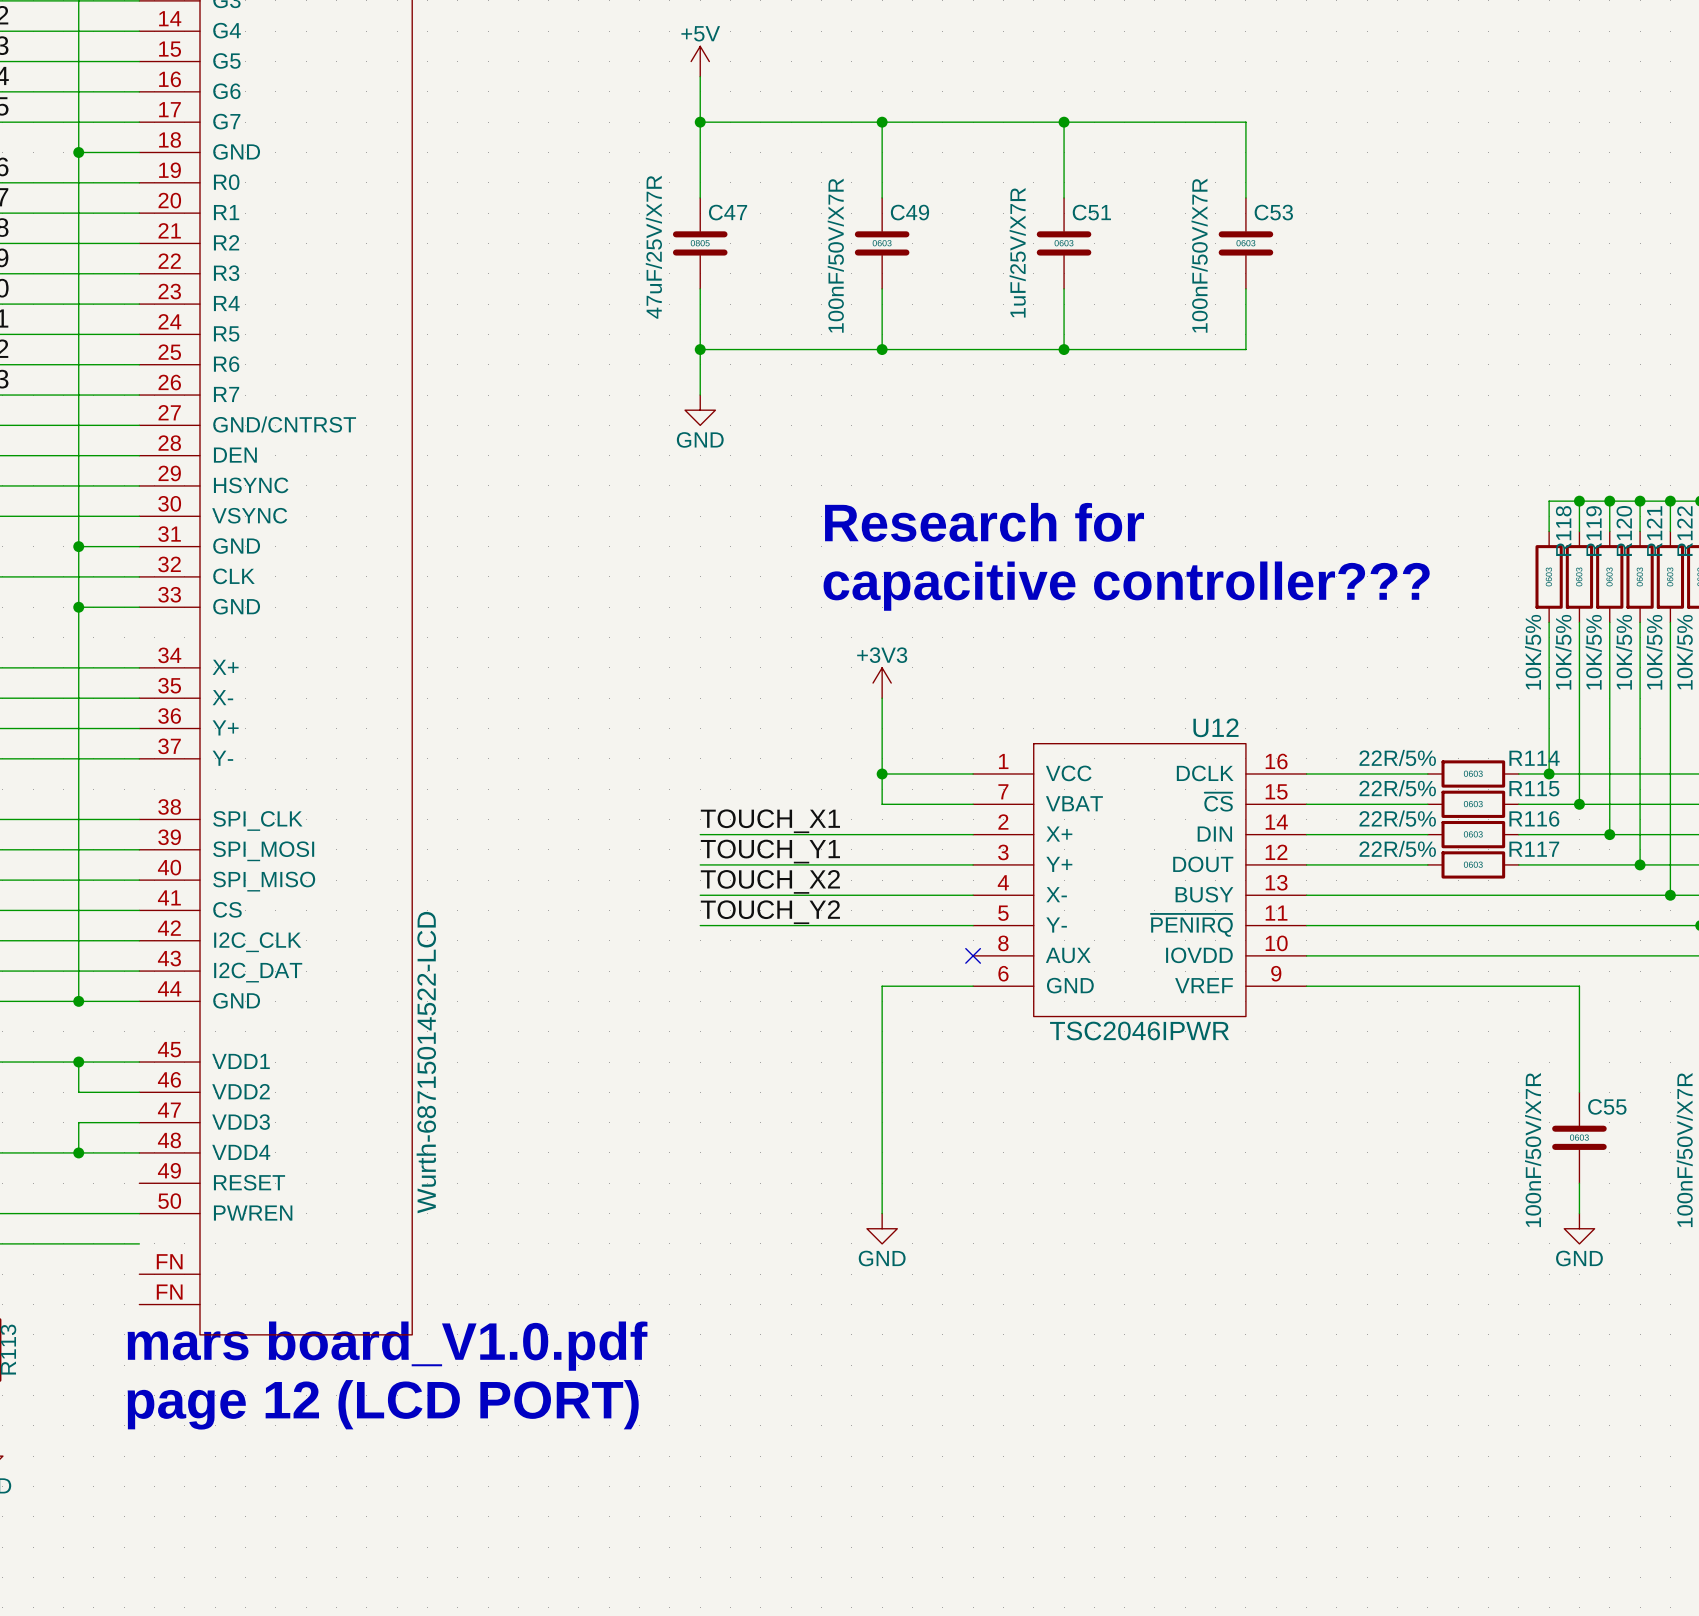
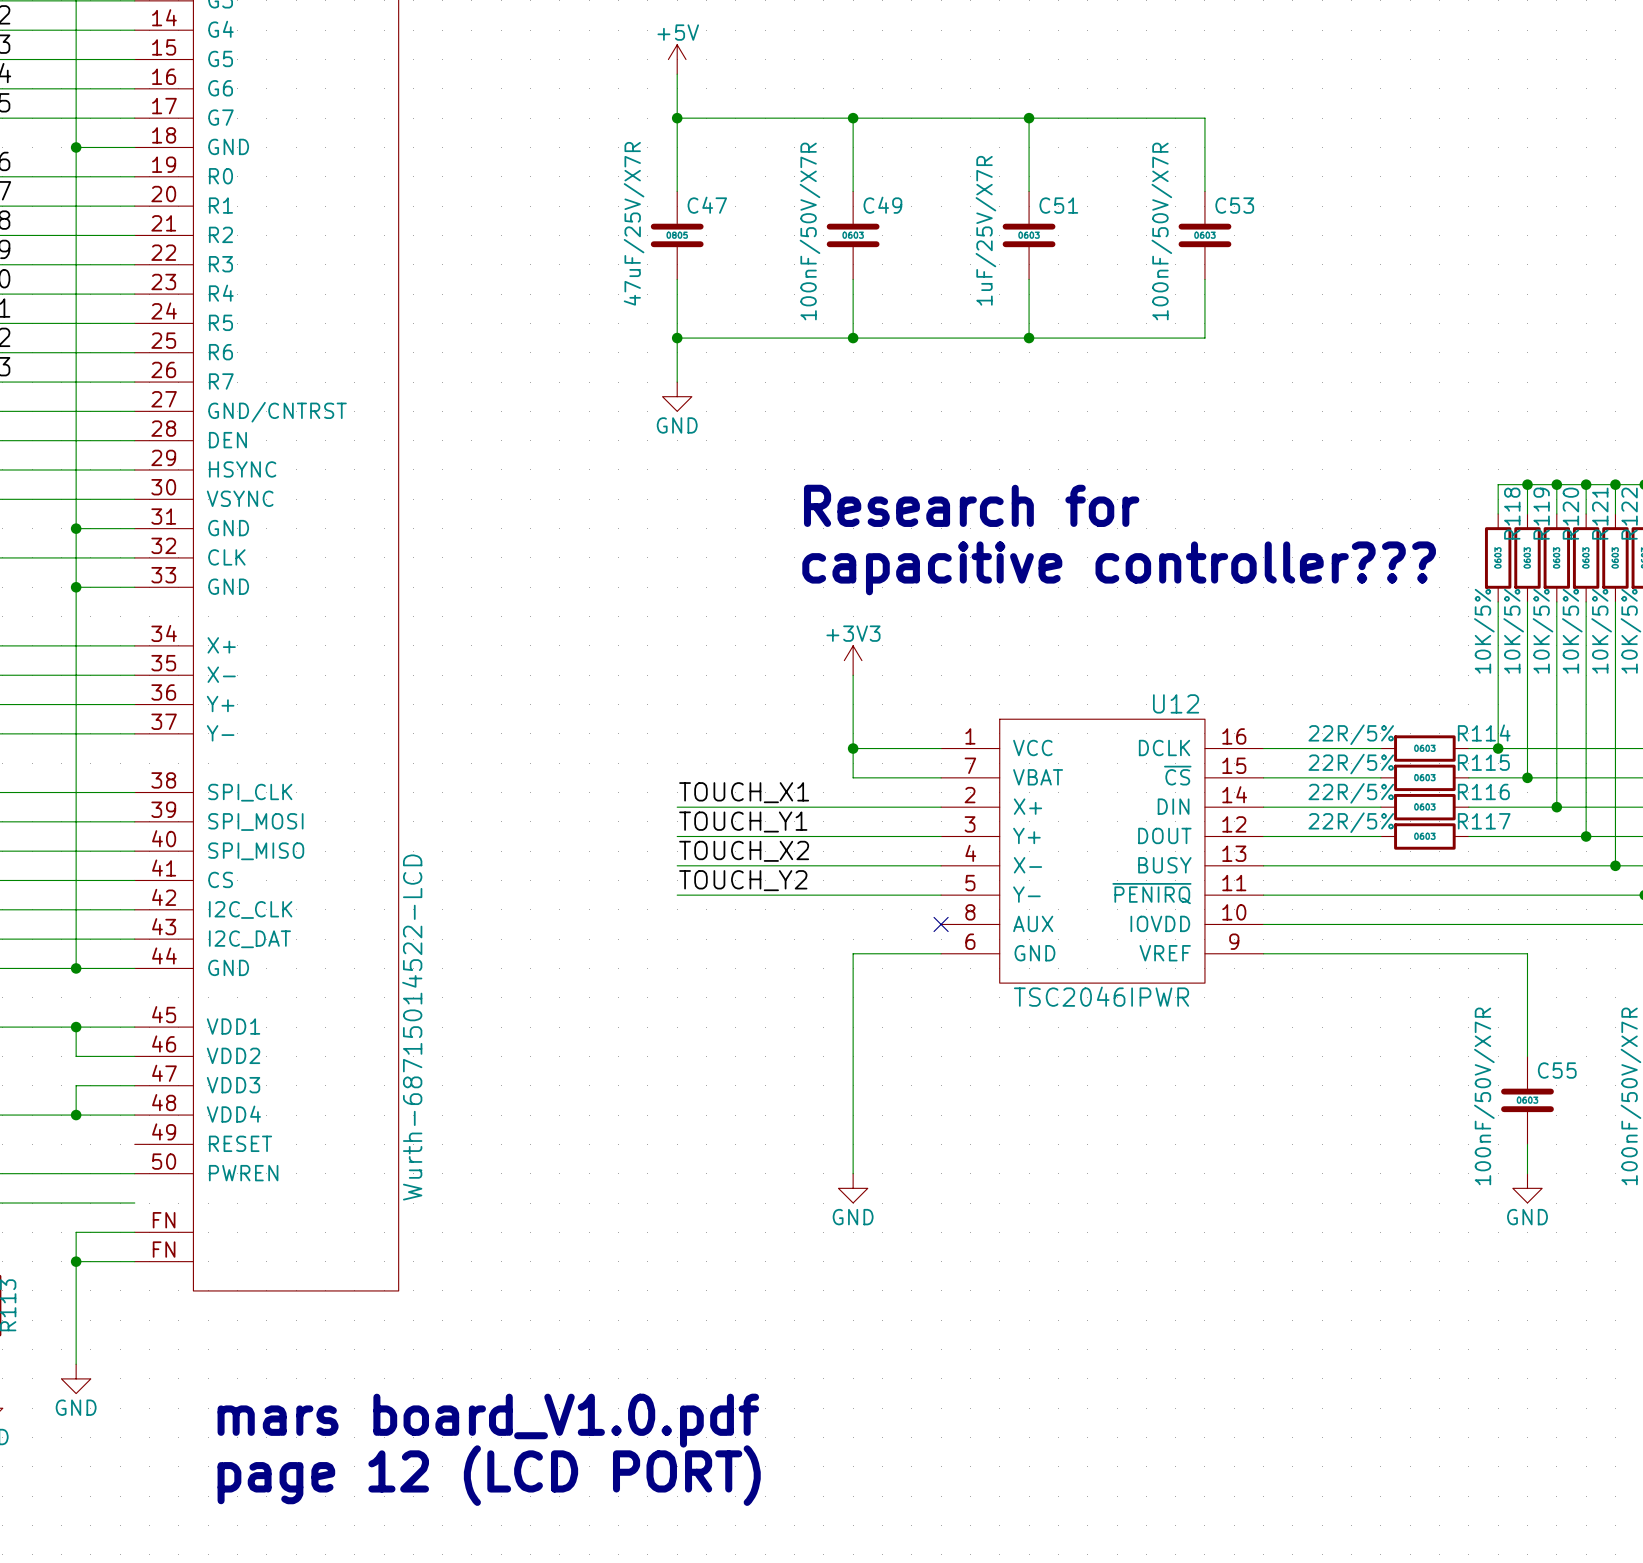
wire: none -> (134, 1232) (76, 1232) (76, 1364)
wire: none -> (76, 1261) (134, 1261)
junction: none -> (76, 1261)
text position: mars board_V1.0.pdf (387, 1346) -> mars board_V1.0.pdf (488, 1420)
text position: page 12 (LCD PORT) (383, 1404) -> page 12 (LCD PORT) (489, 1475)
power symbol: none -> GND (76, 1378)

